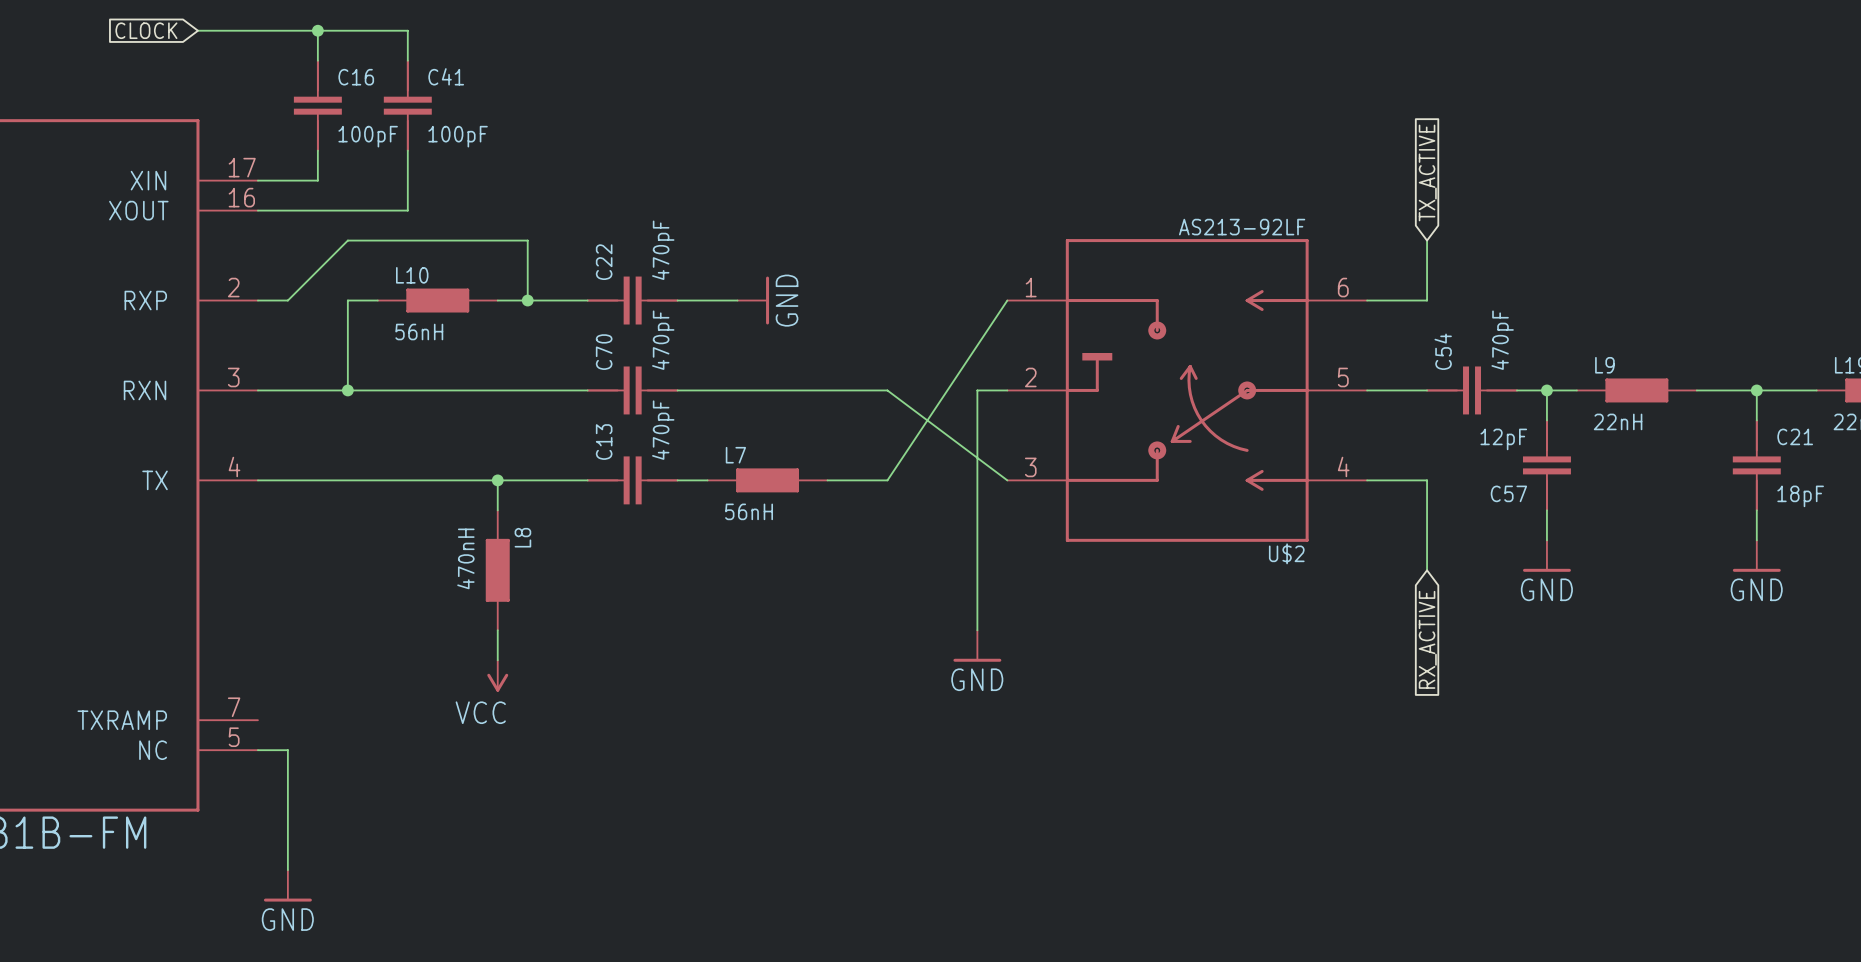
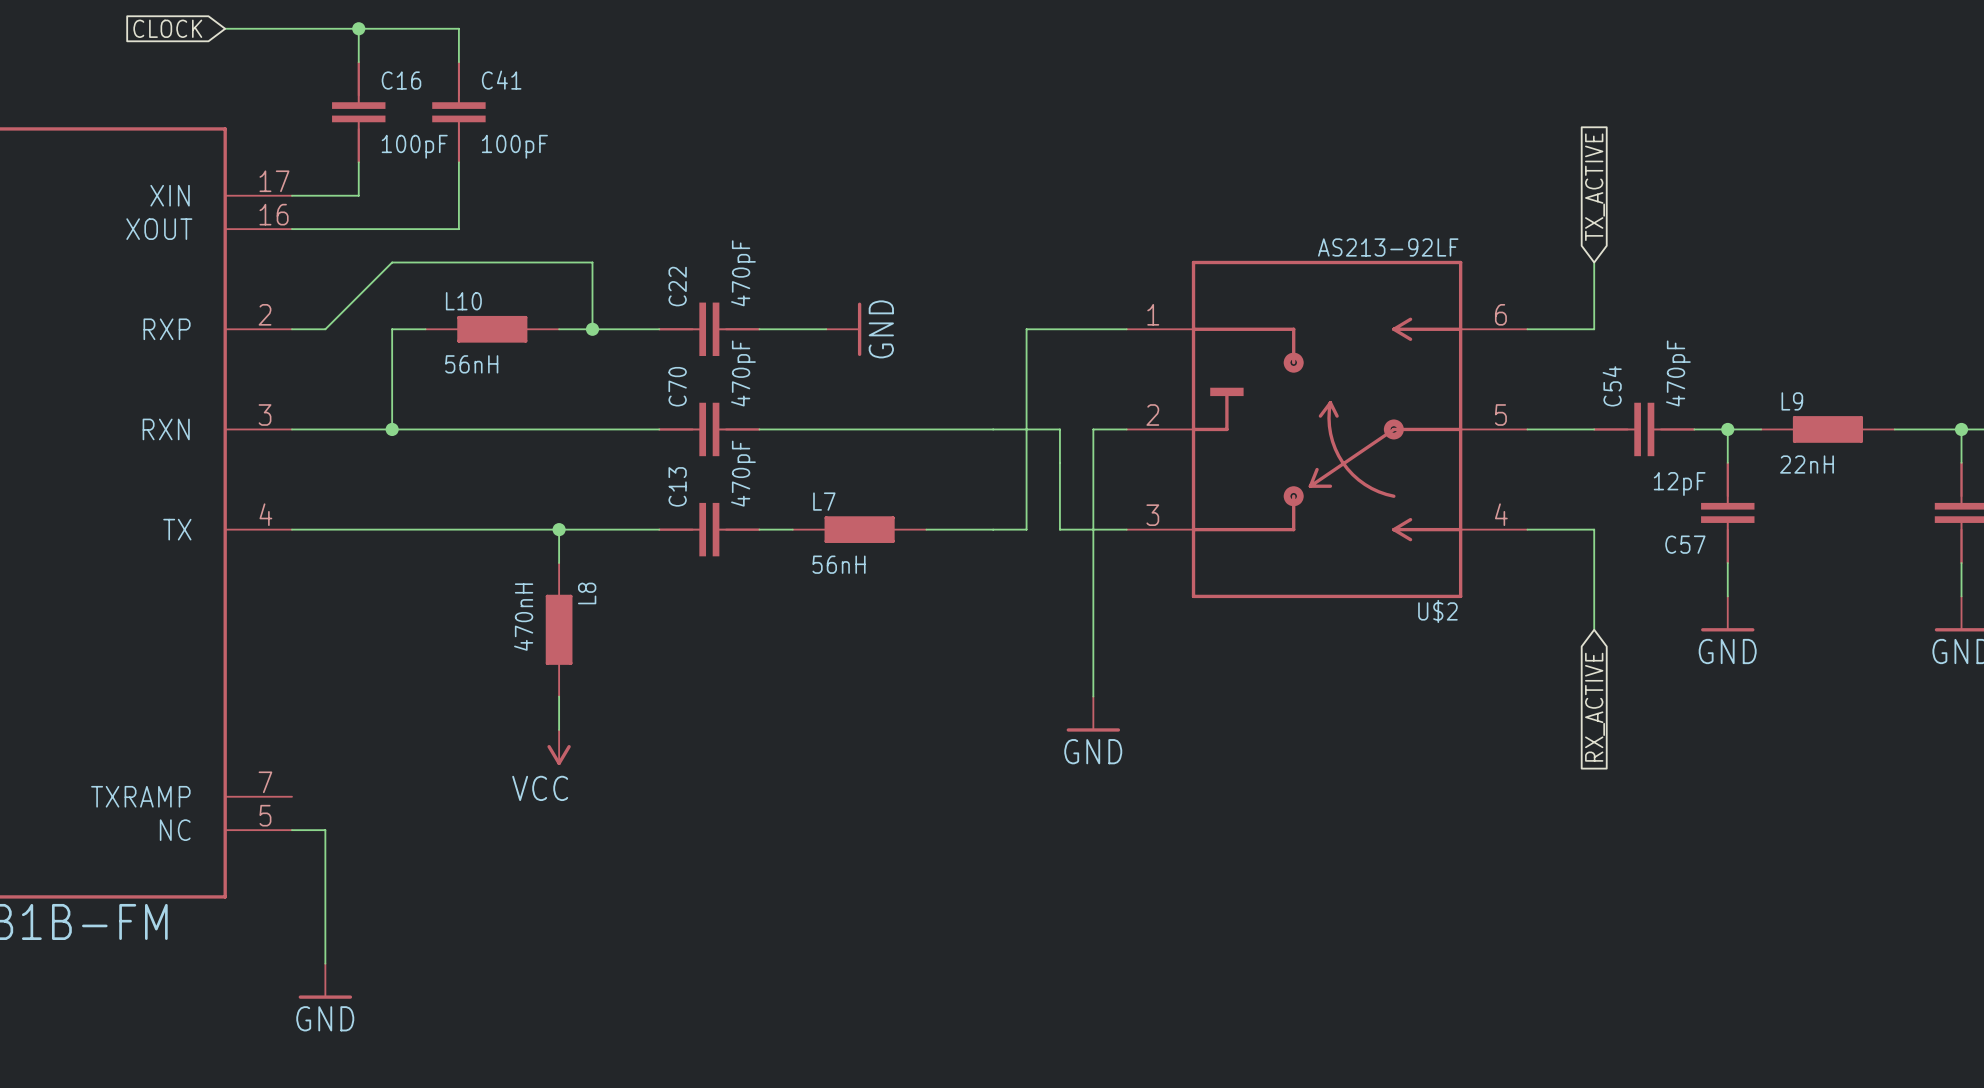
wire: (1007, 300) (887, 480) -> (1126, 329) (1026, 329) (1026, 529) (993, 529)
wire: (887, 390) (1007, 480) -> (993, 429) (1059, 429) (1059, 529) (1126, 529)

